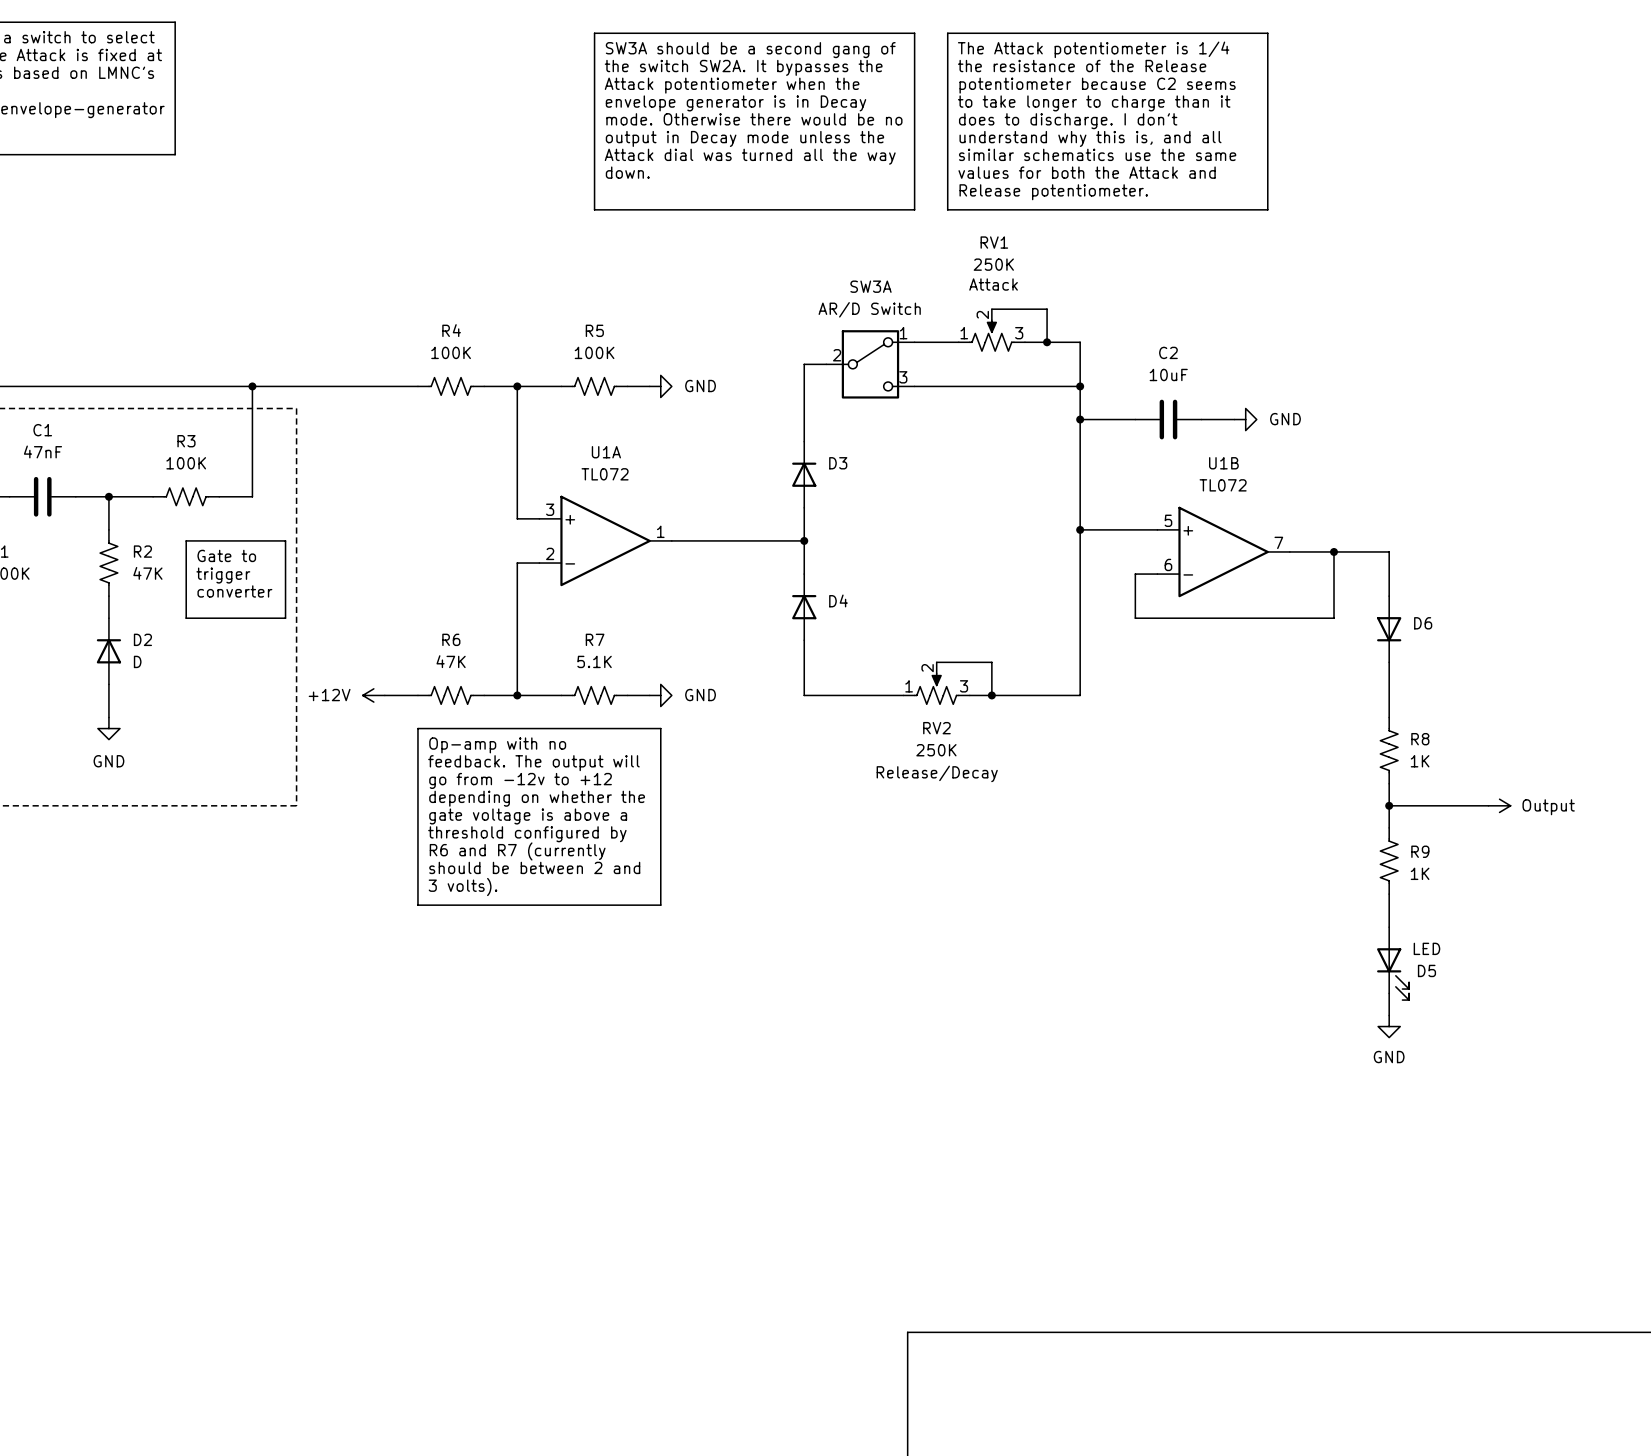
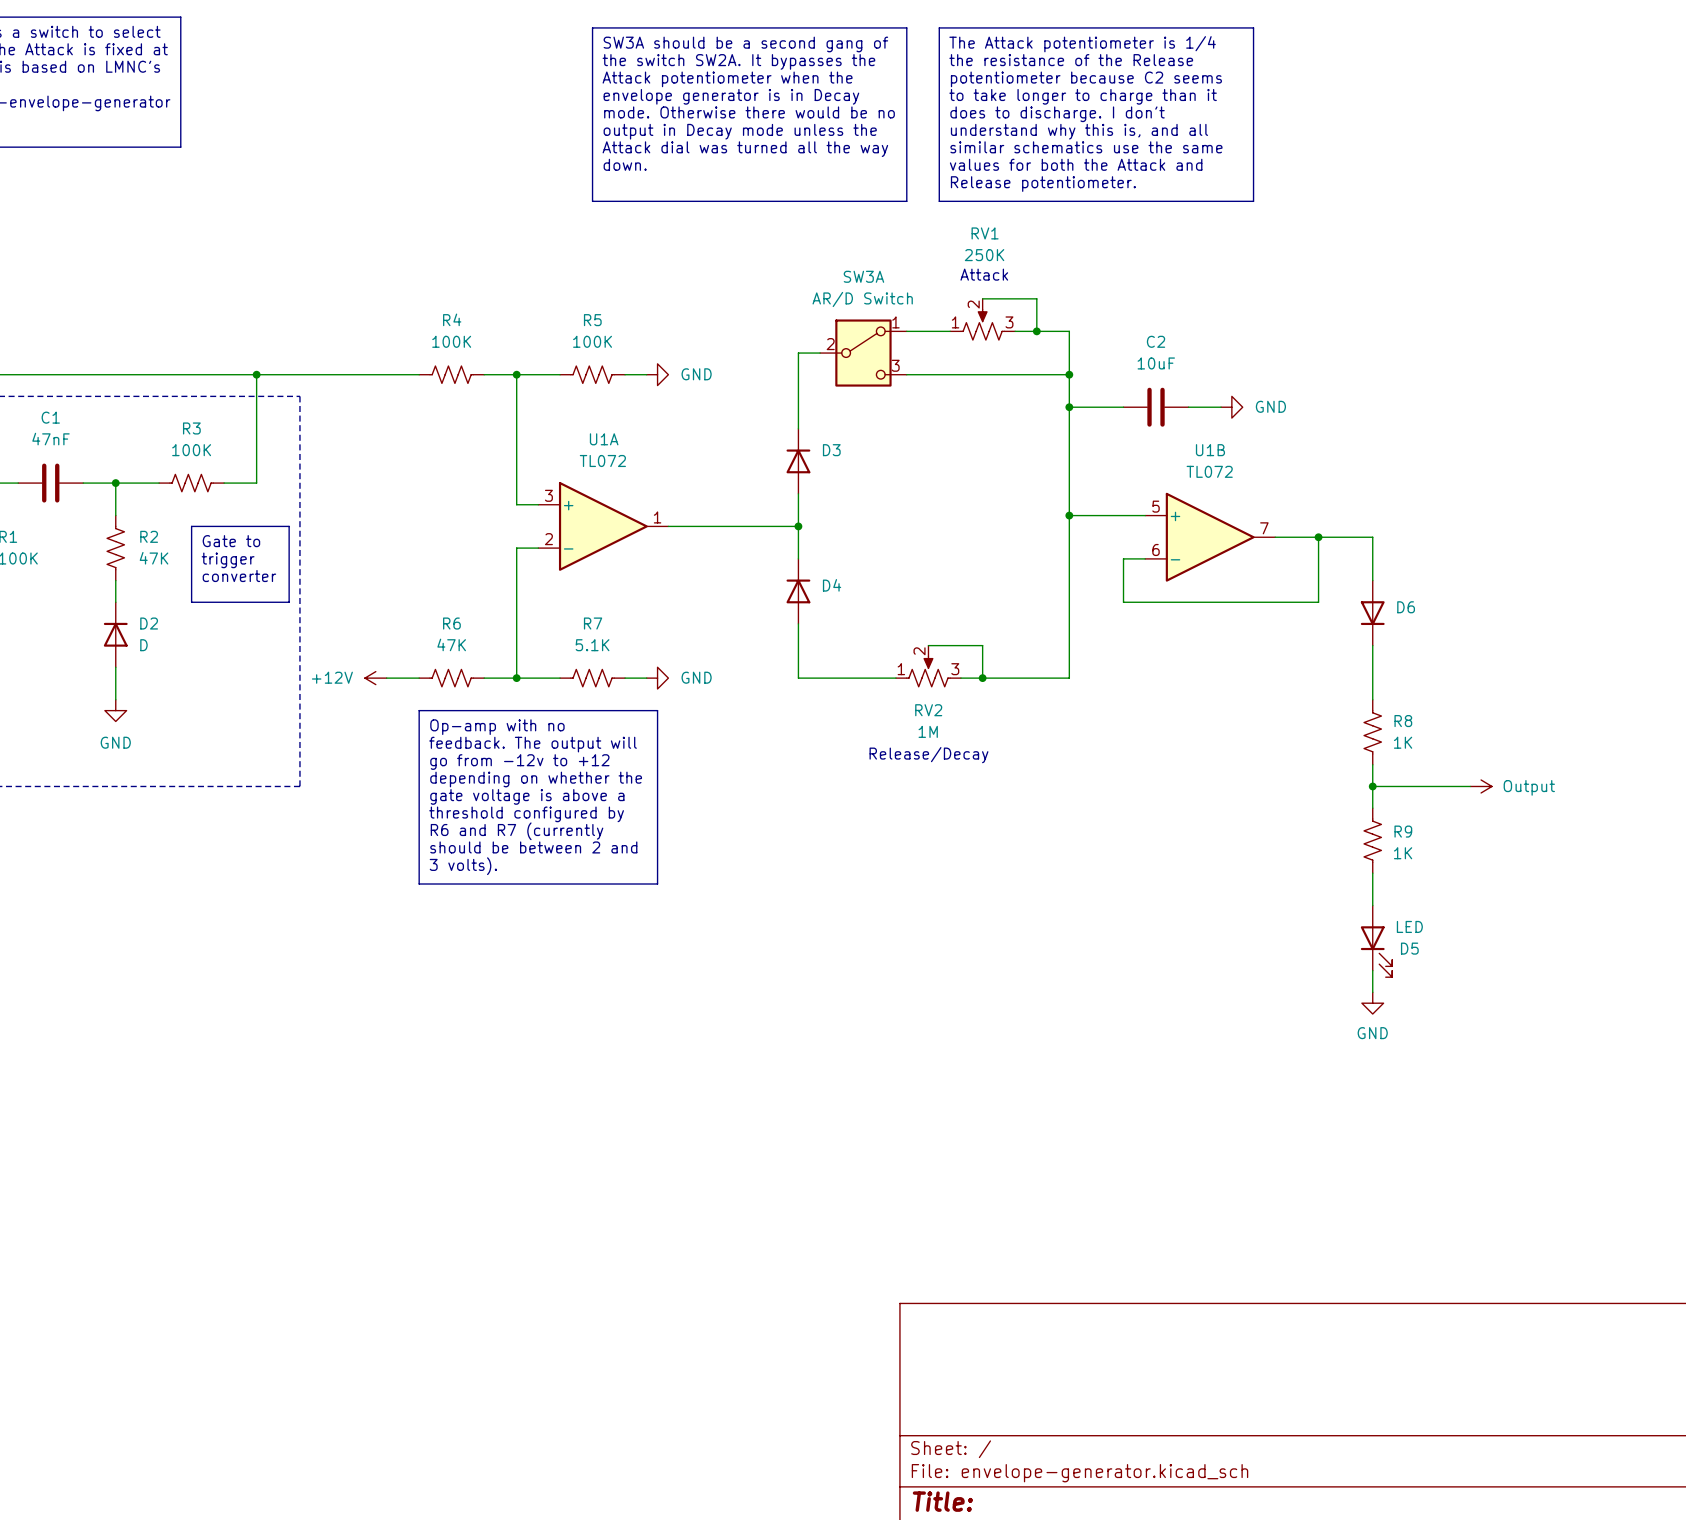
RV2 value: 250K (936, 750) -> 1M (928, 731)

